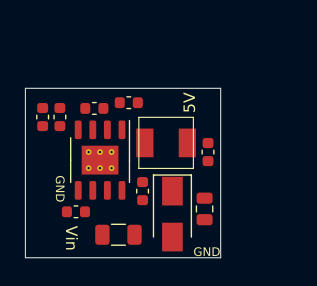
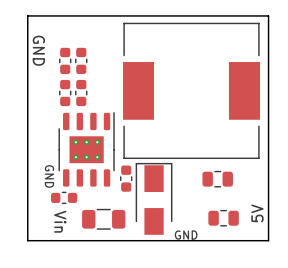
text: none -> GND (38, 50)
part: none -> (65, 60)
part: none -> (81, 60)
part: none -> (191, 90)
part: none -> (65, 93)
part: (128, 102) -> none
text position: 5V (189, 102) -> 5V (257, 213)
part rotation: 0° (94, 108) -> 90° clockwise (81, 93)
part: (42, 117) -> none
part: (59, 117) -> none
part: (166, 142) -> none
part: (208, 152) -> none
part: none -> (217, 179)
part: (204, 208) -> none
part: none -> (223, 218)
board edge: (36, 257) (25, 257) (25, 88) (220, 88) (220, 257) -> (27, 240) (27, 15) (268, 15) (268, 240) (198, 240)

